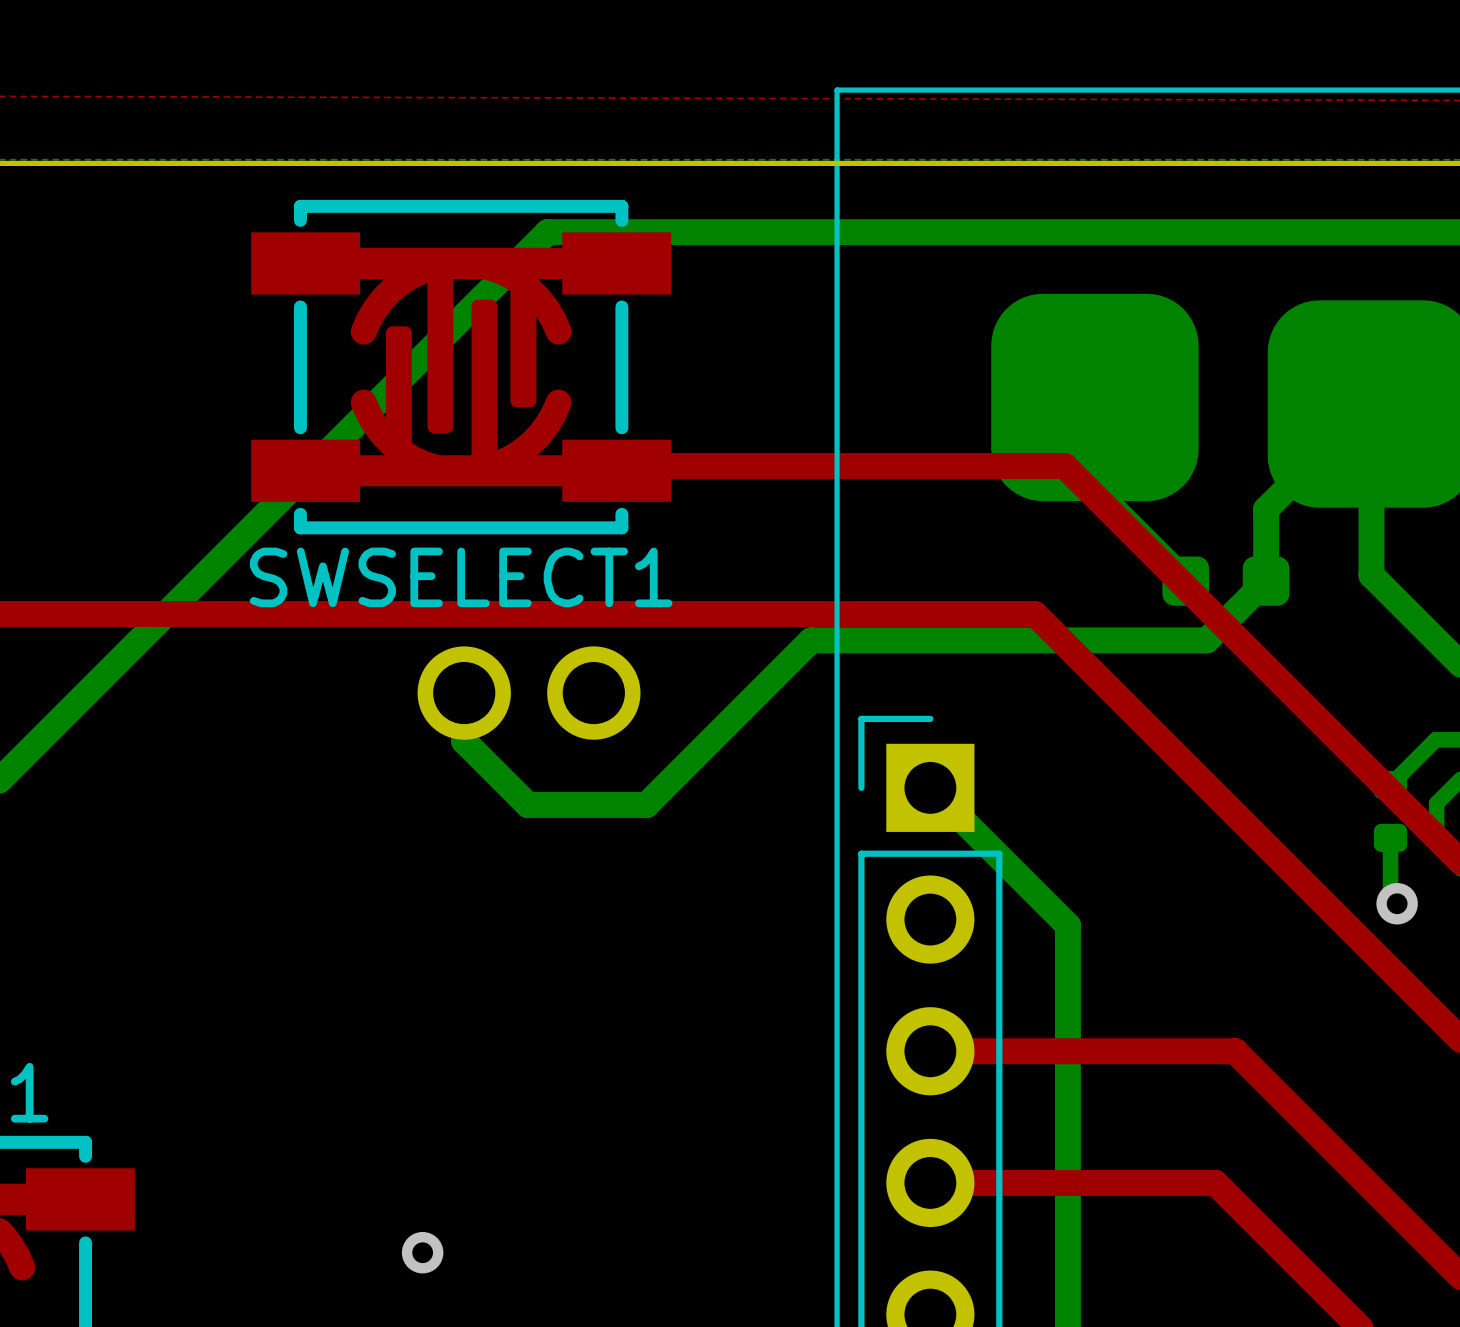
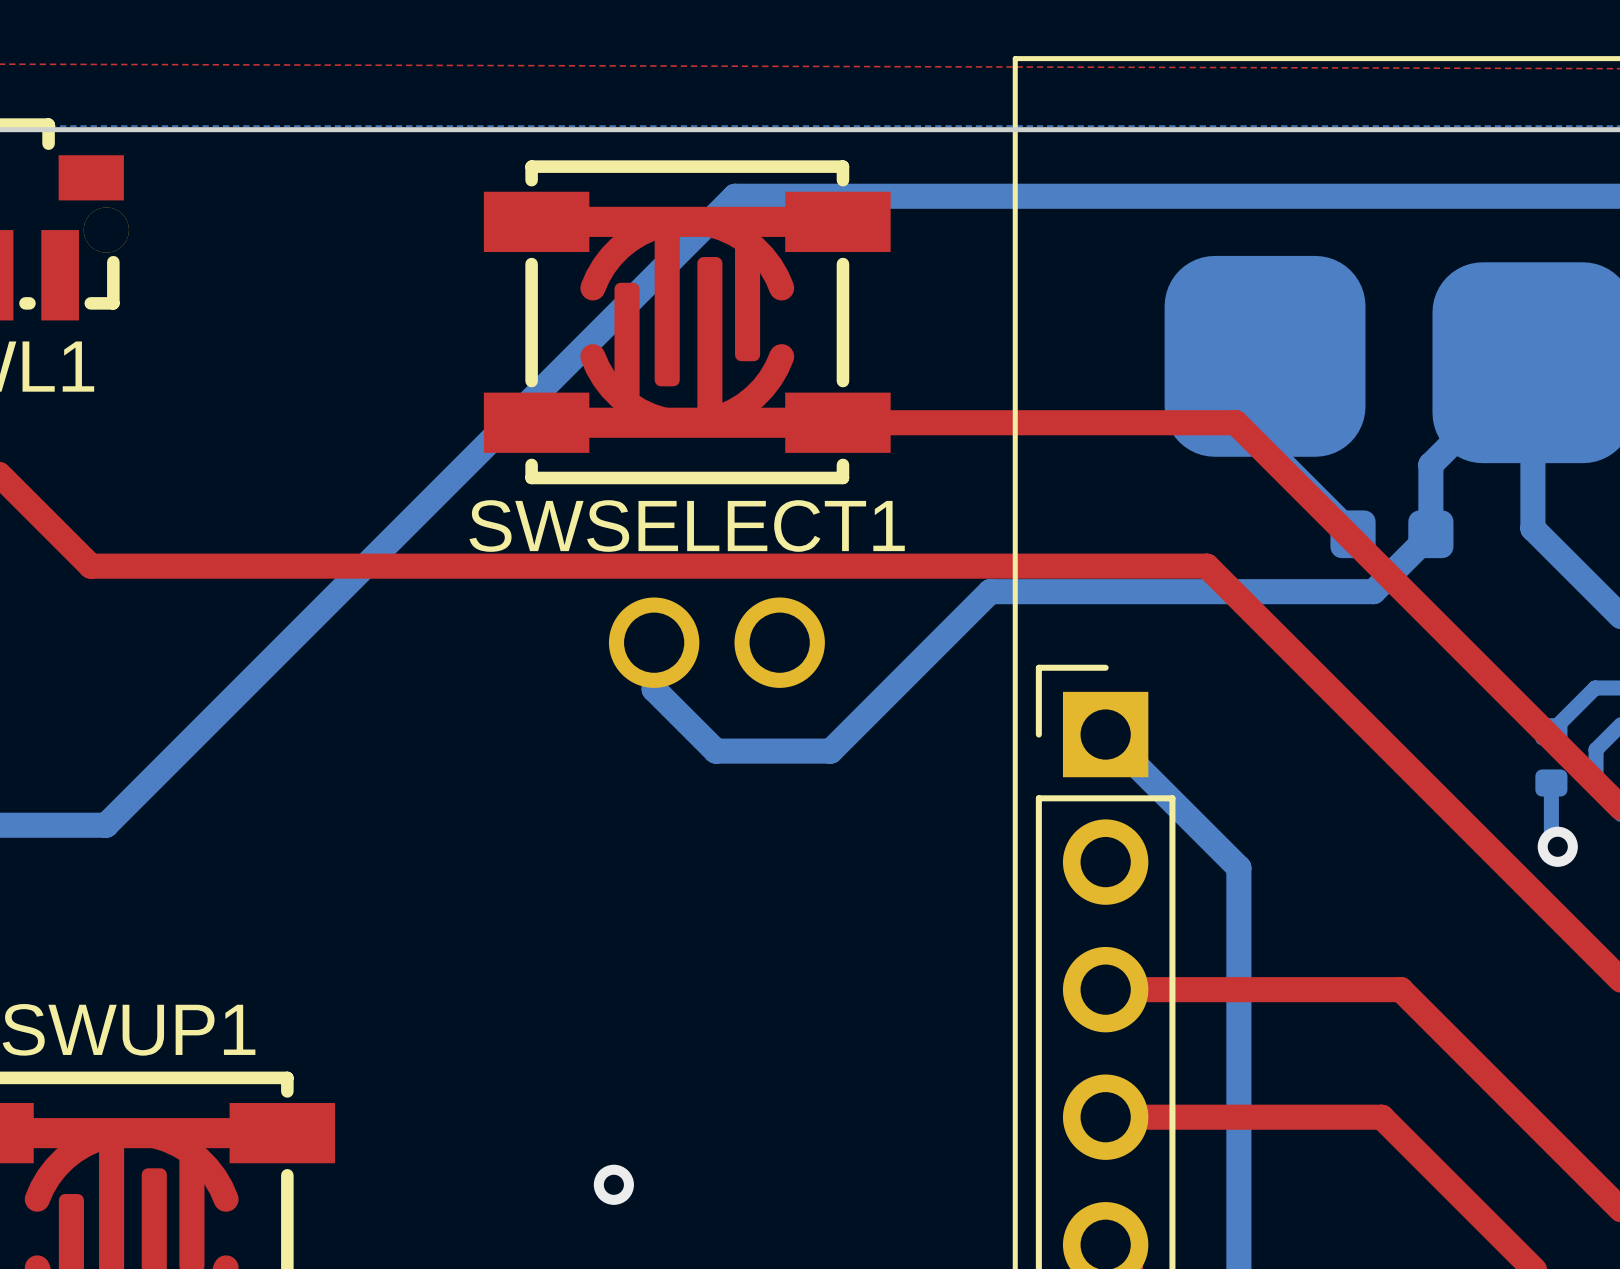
SWSELECT1 position: (461, 367) -> (687, 322)

